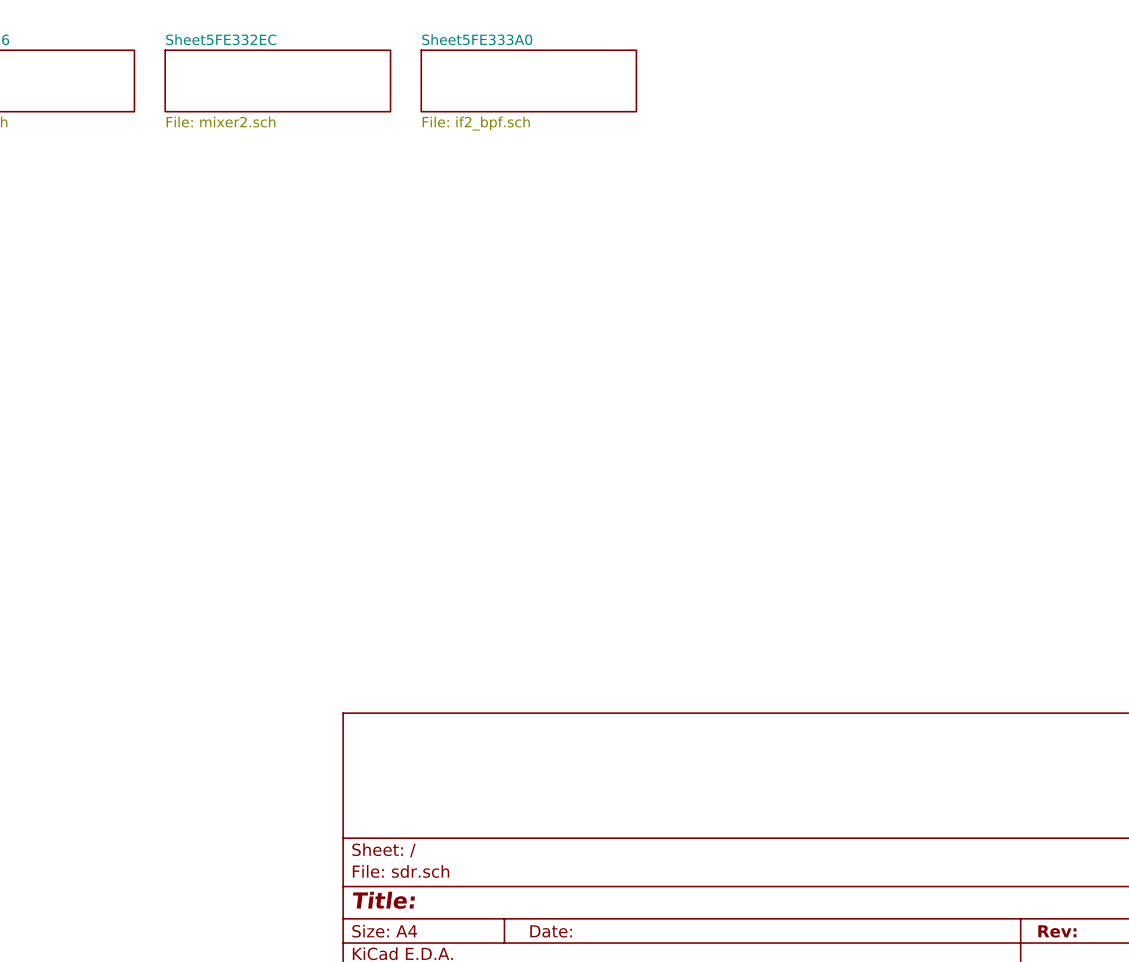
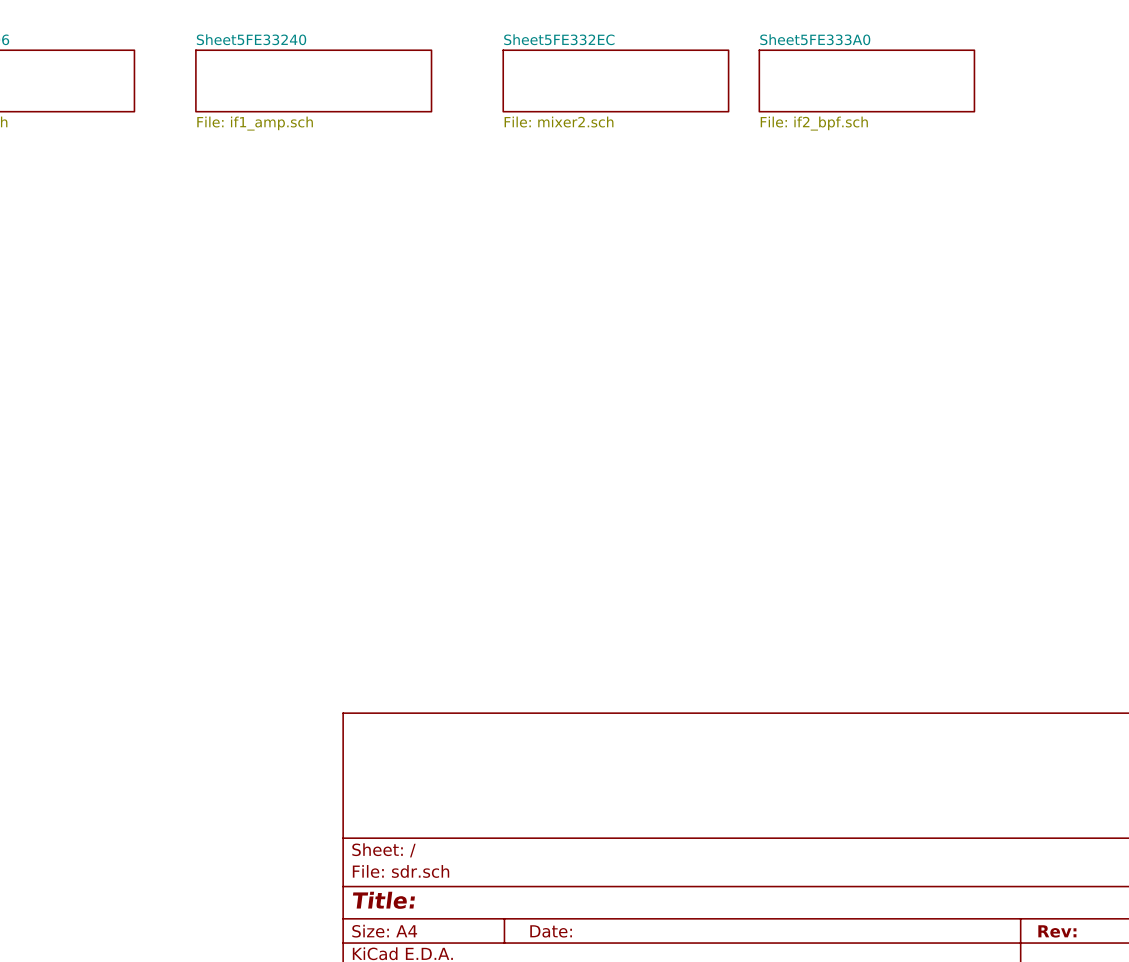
sheet Sheet5FE332EC position: (277, 80) -> (615, 80)
sheet Sheet5FE33240: none -> File: if1_amp.sch (313, 80)
sheet Sheet5FE333A0 position: (528, 80) -> (866, 80)

